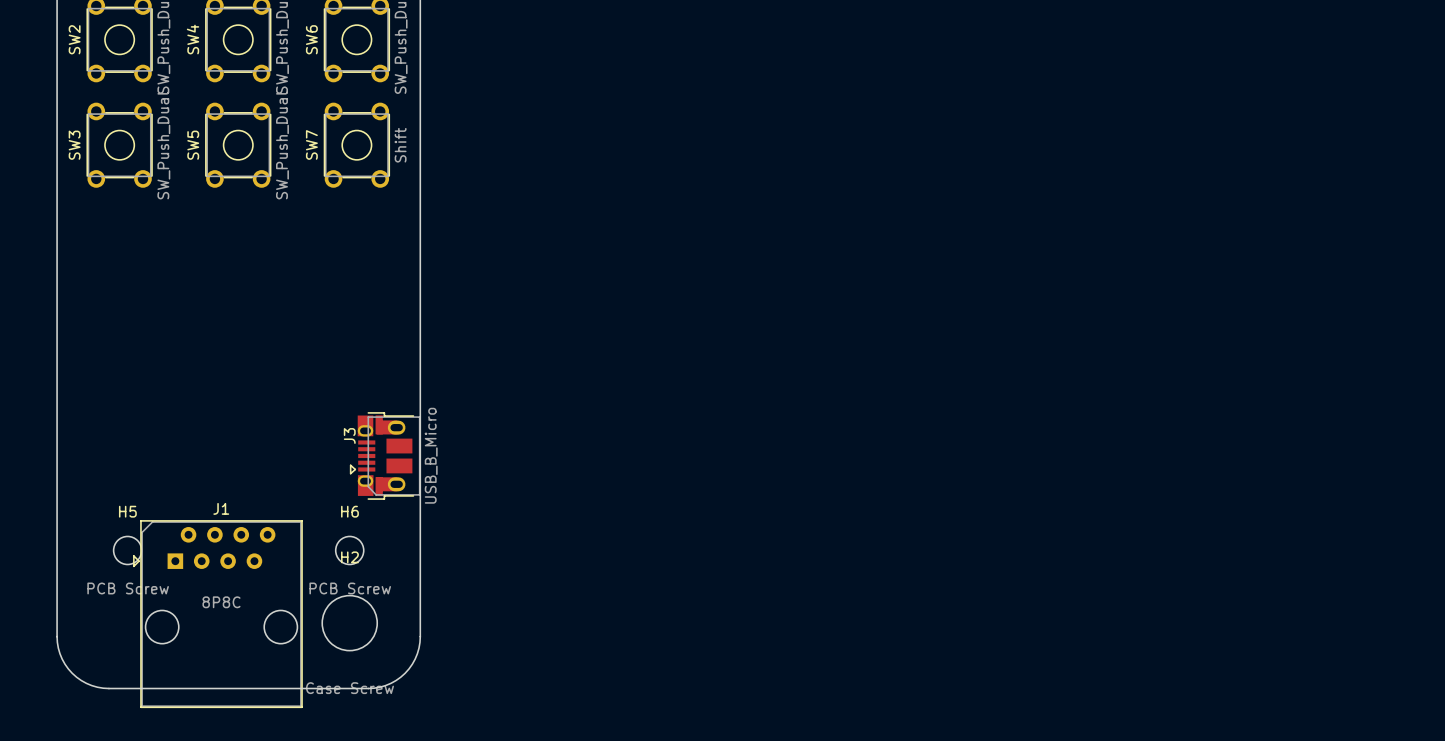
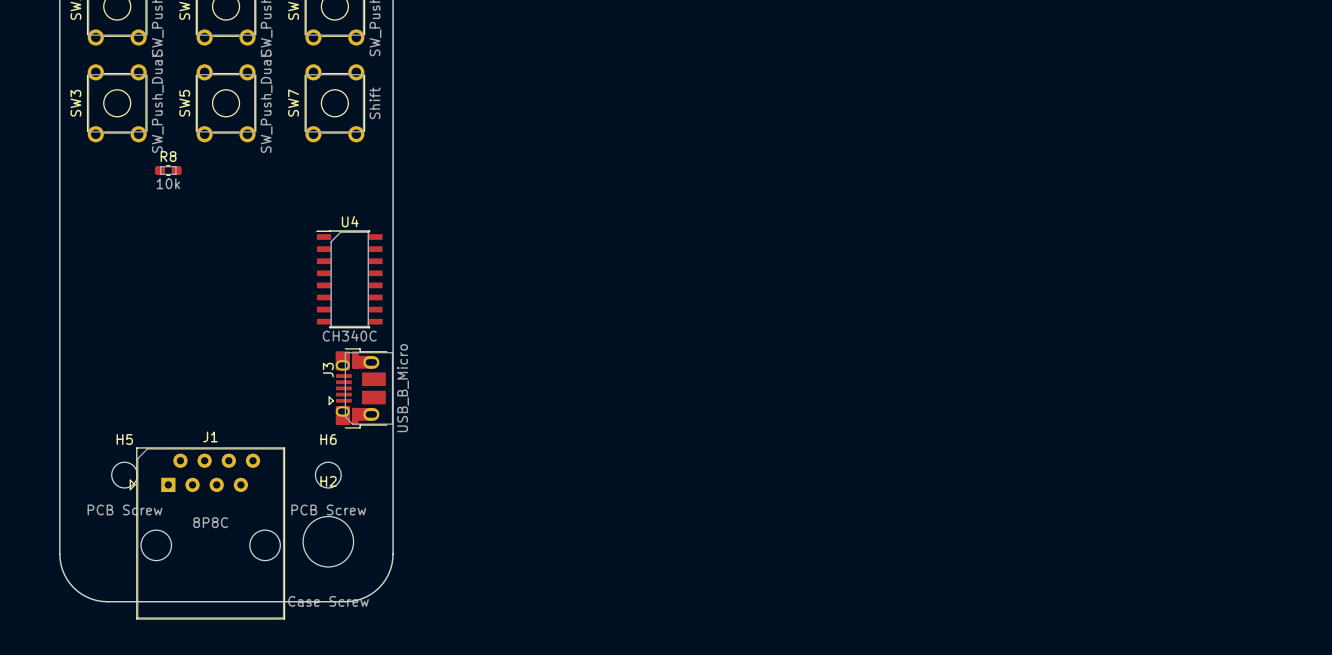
R8: none -> 10k (168, 170)
U4: none -> CH340C (349, 279)

